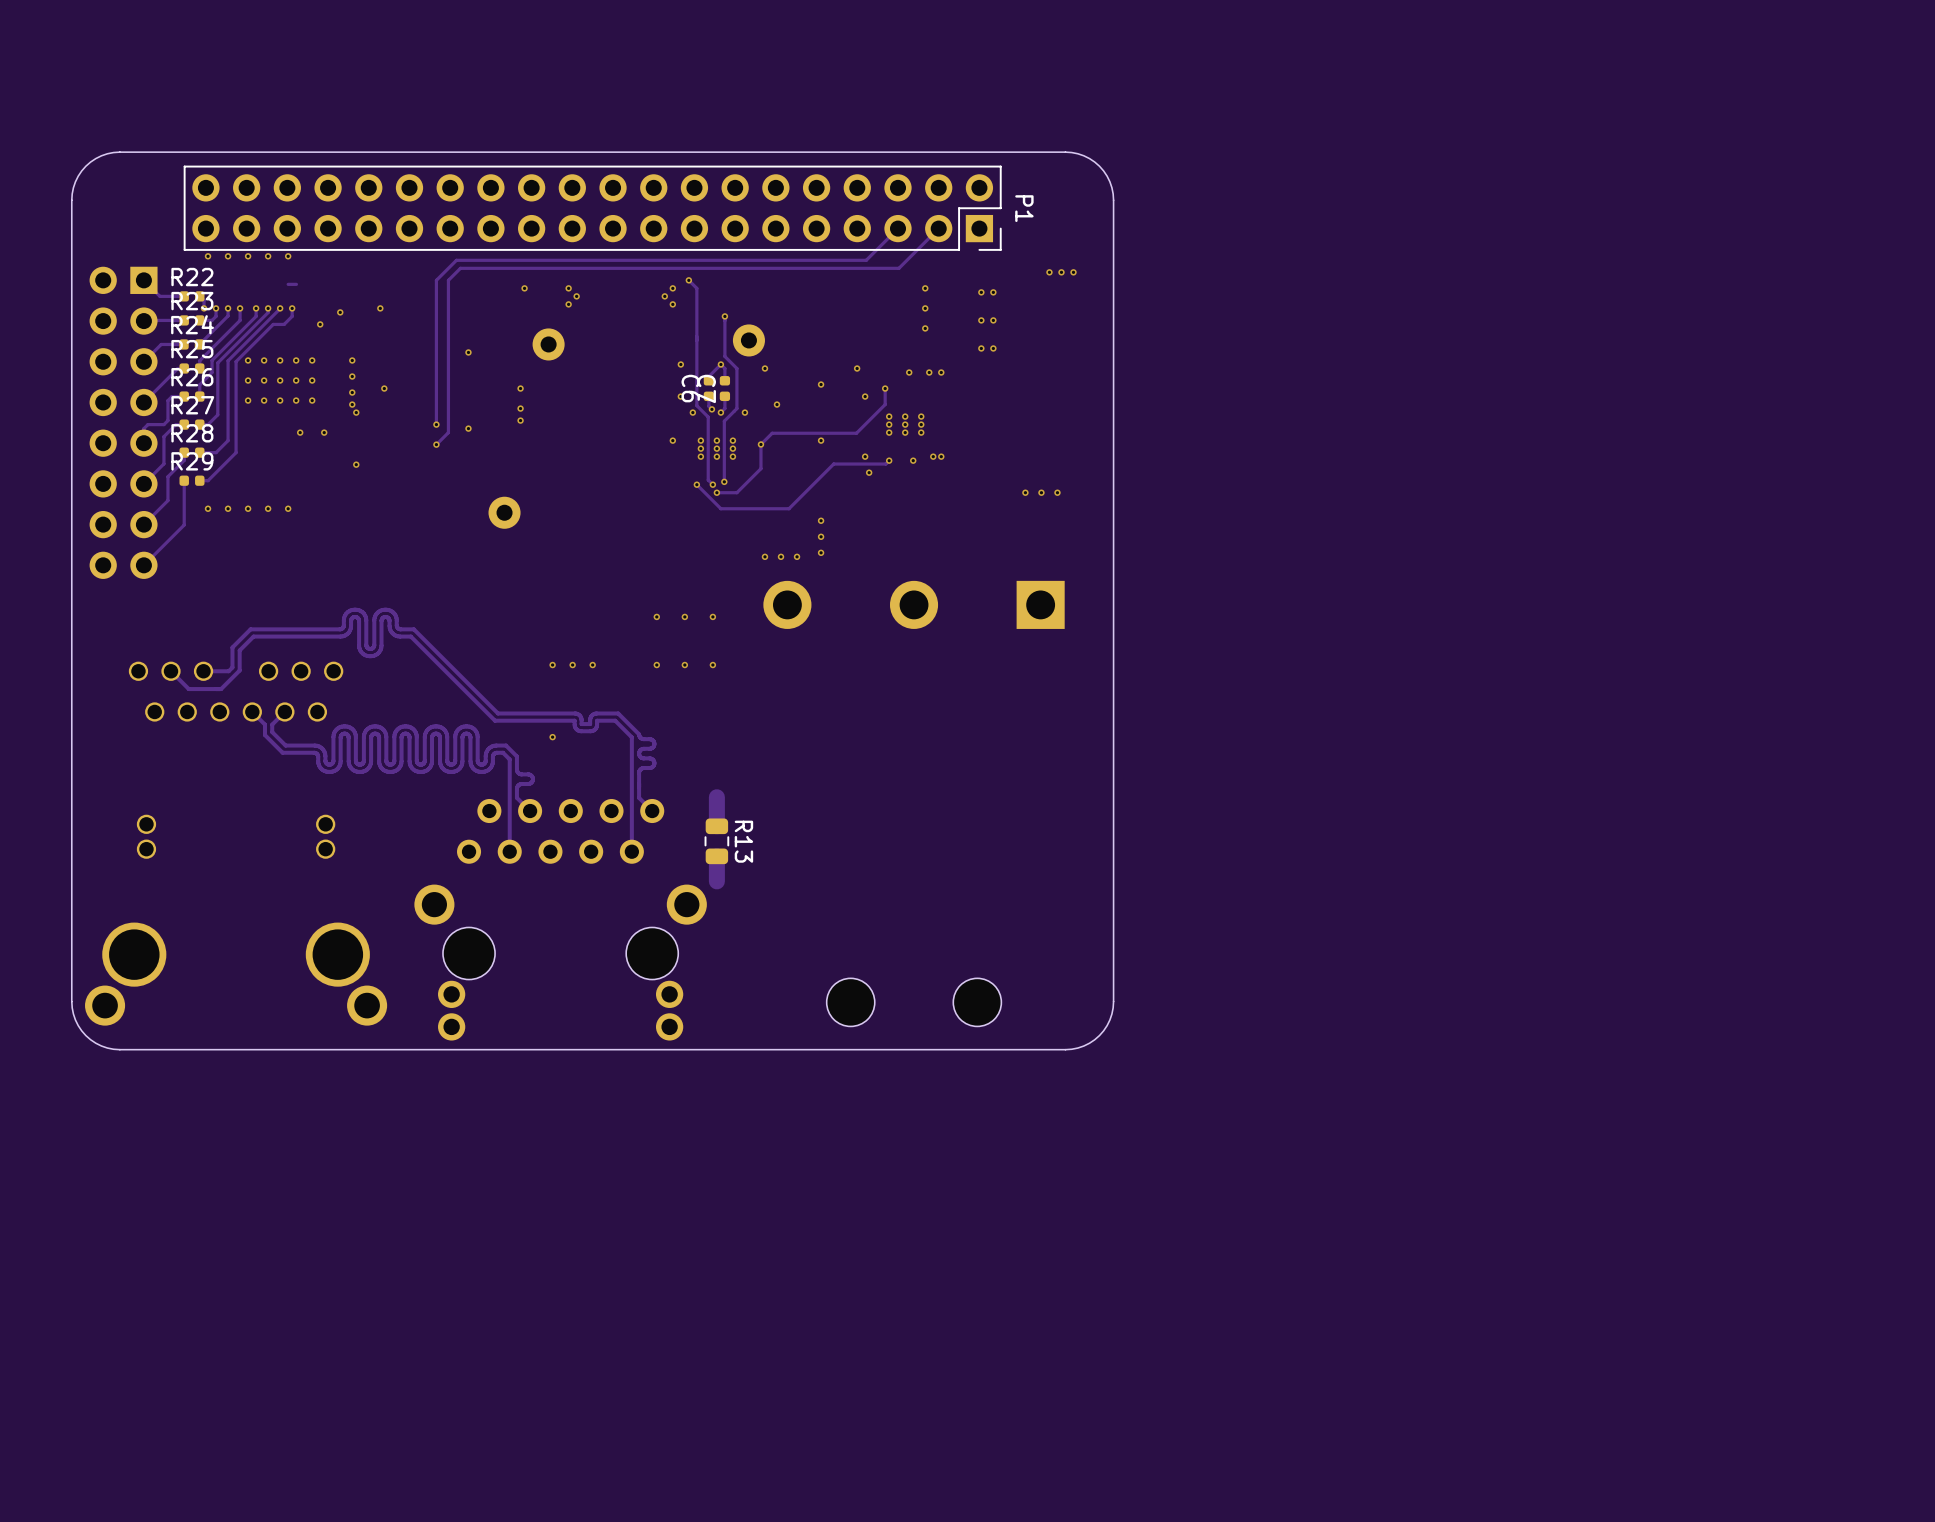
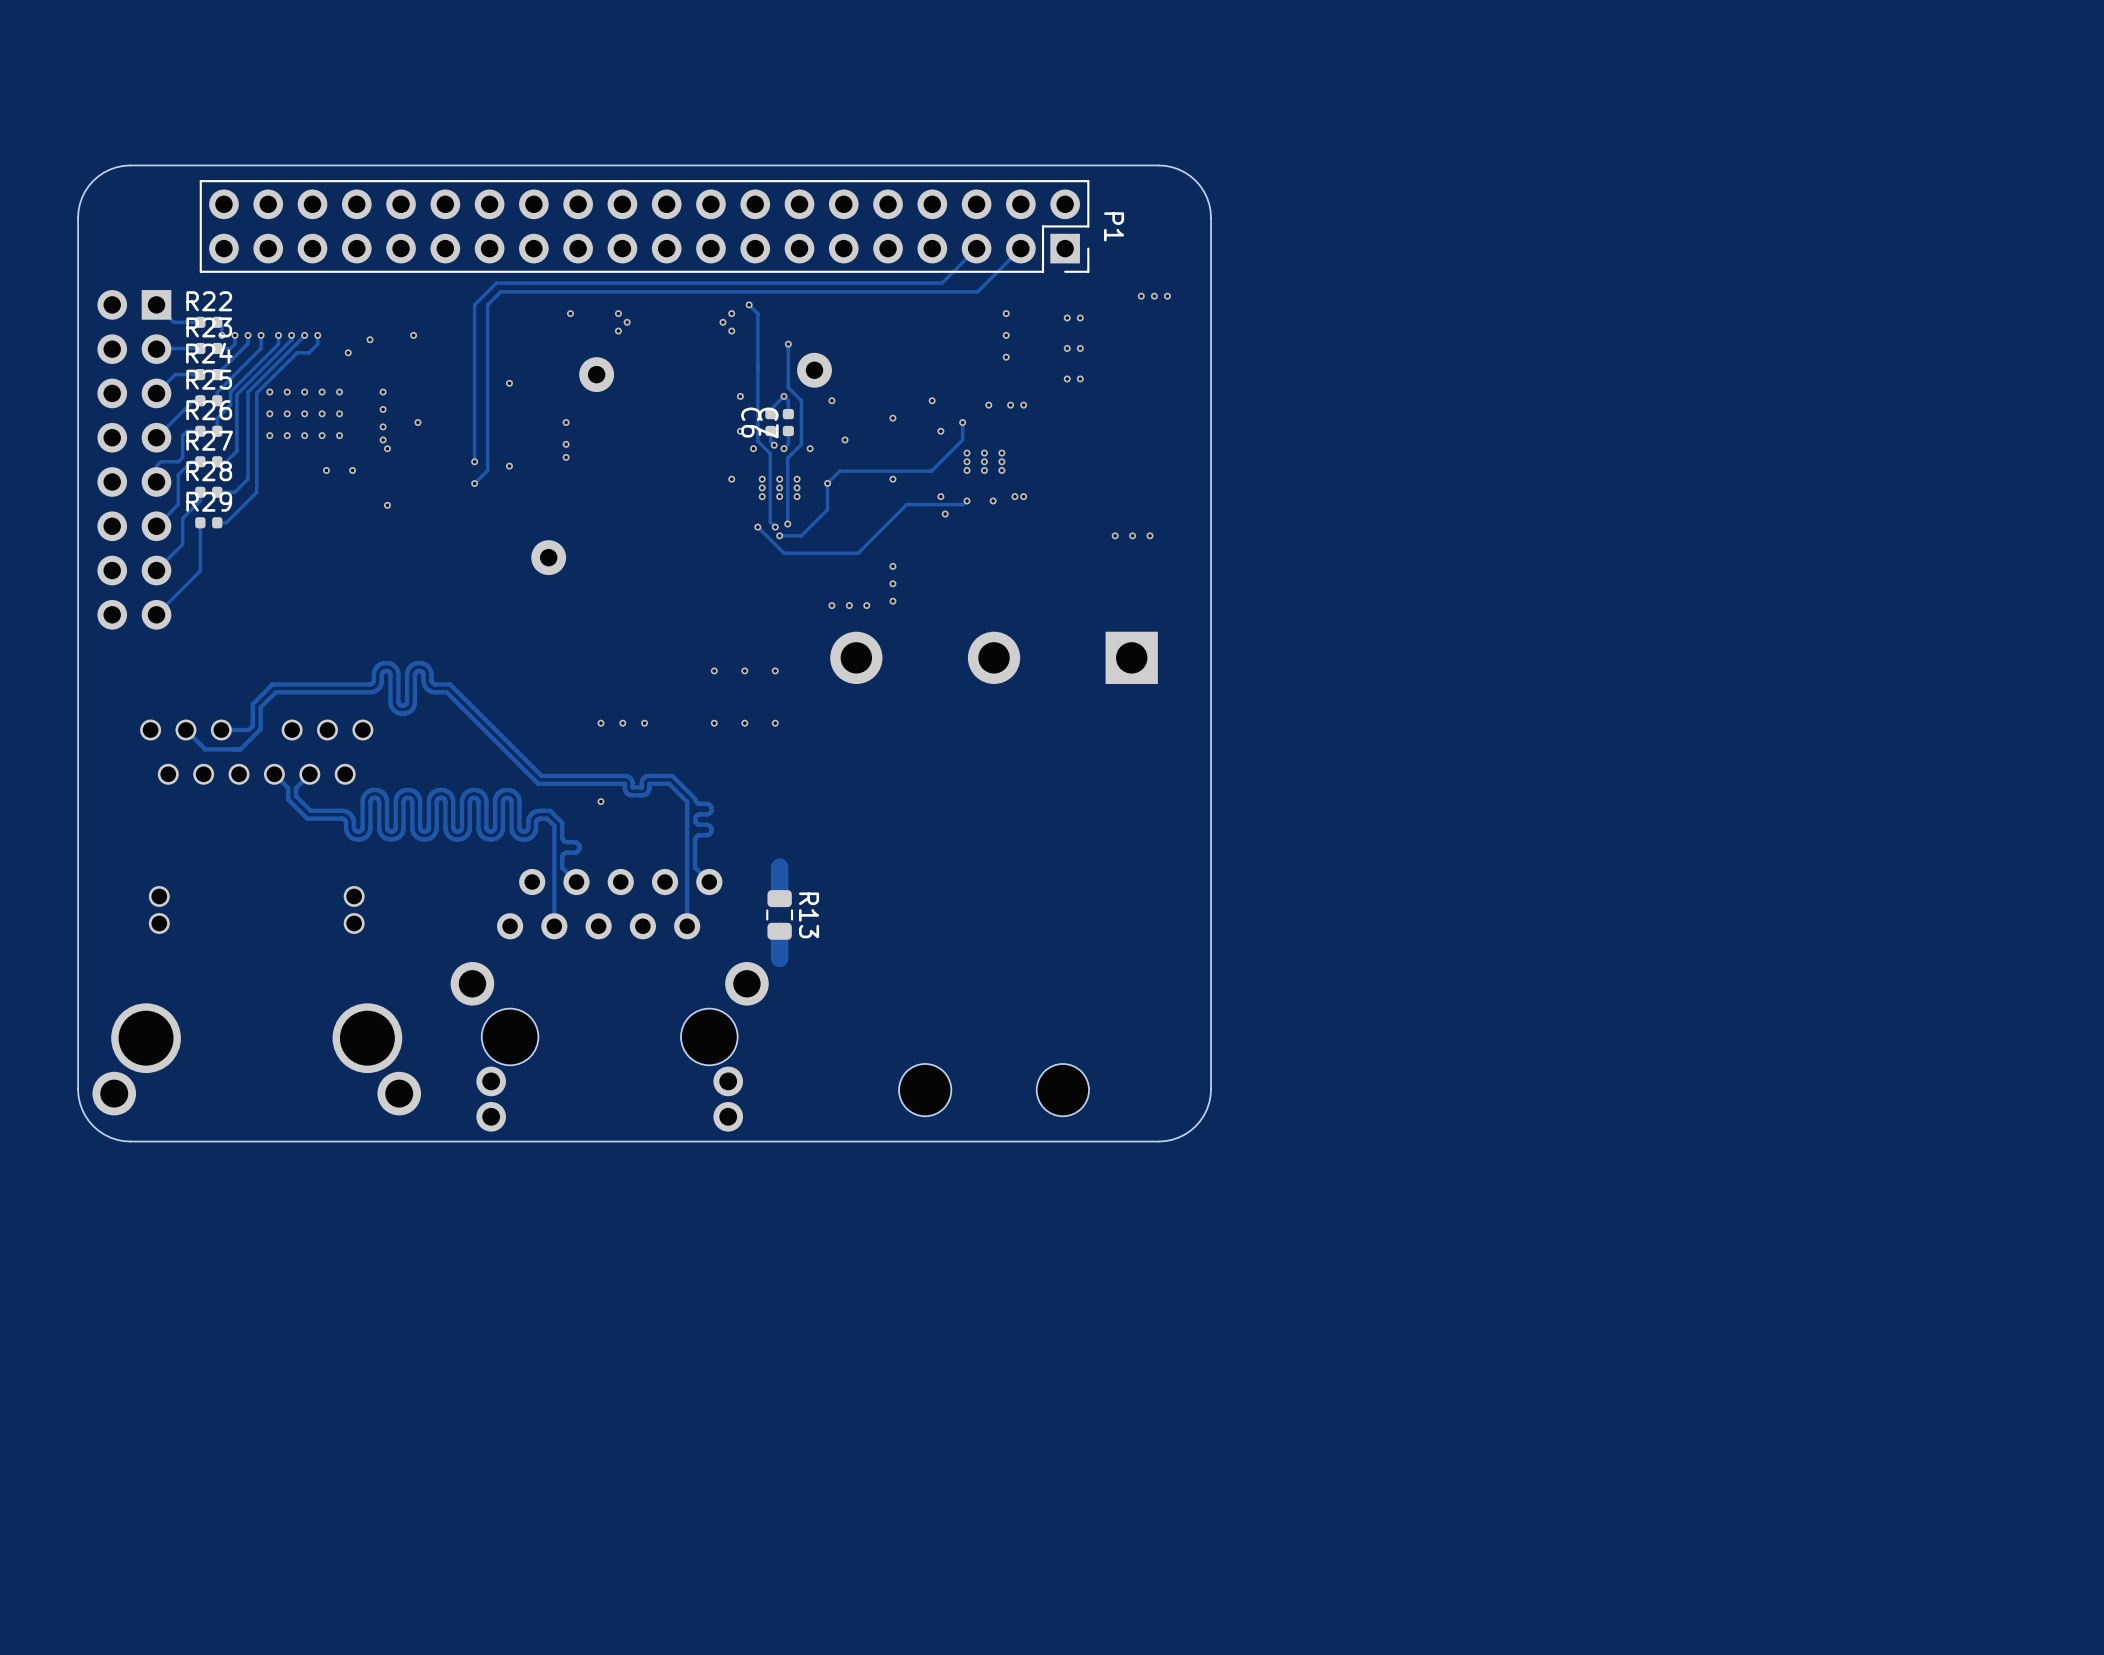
via: (208, 256) -> none
via: (228, 256) -> none
via: (248, 256) -> none
via: (268, 256) -> none
via: (288, 256) -> none
track: (296, 284) (288, 284) -> none
via: (208, 508) -> none
via: (228, 508) -> none
via: (248, 508) -> none
via: (268, 508) -> none
via: (288, 508) -> none

